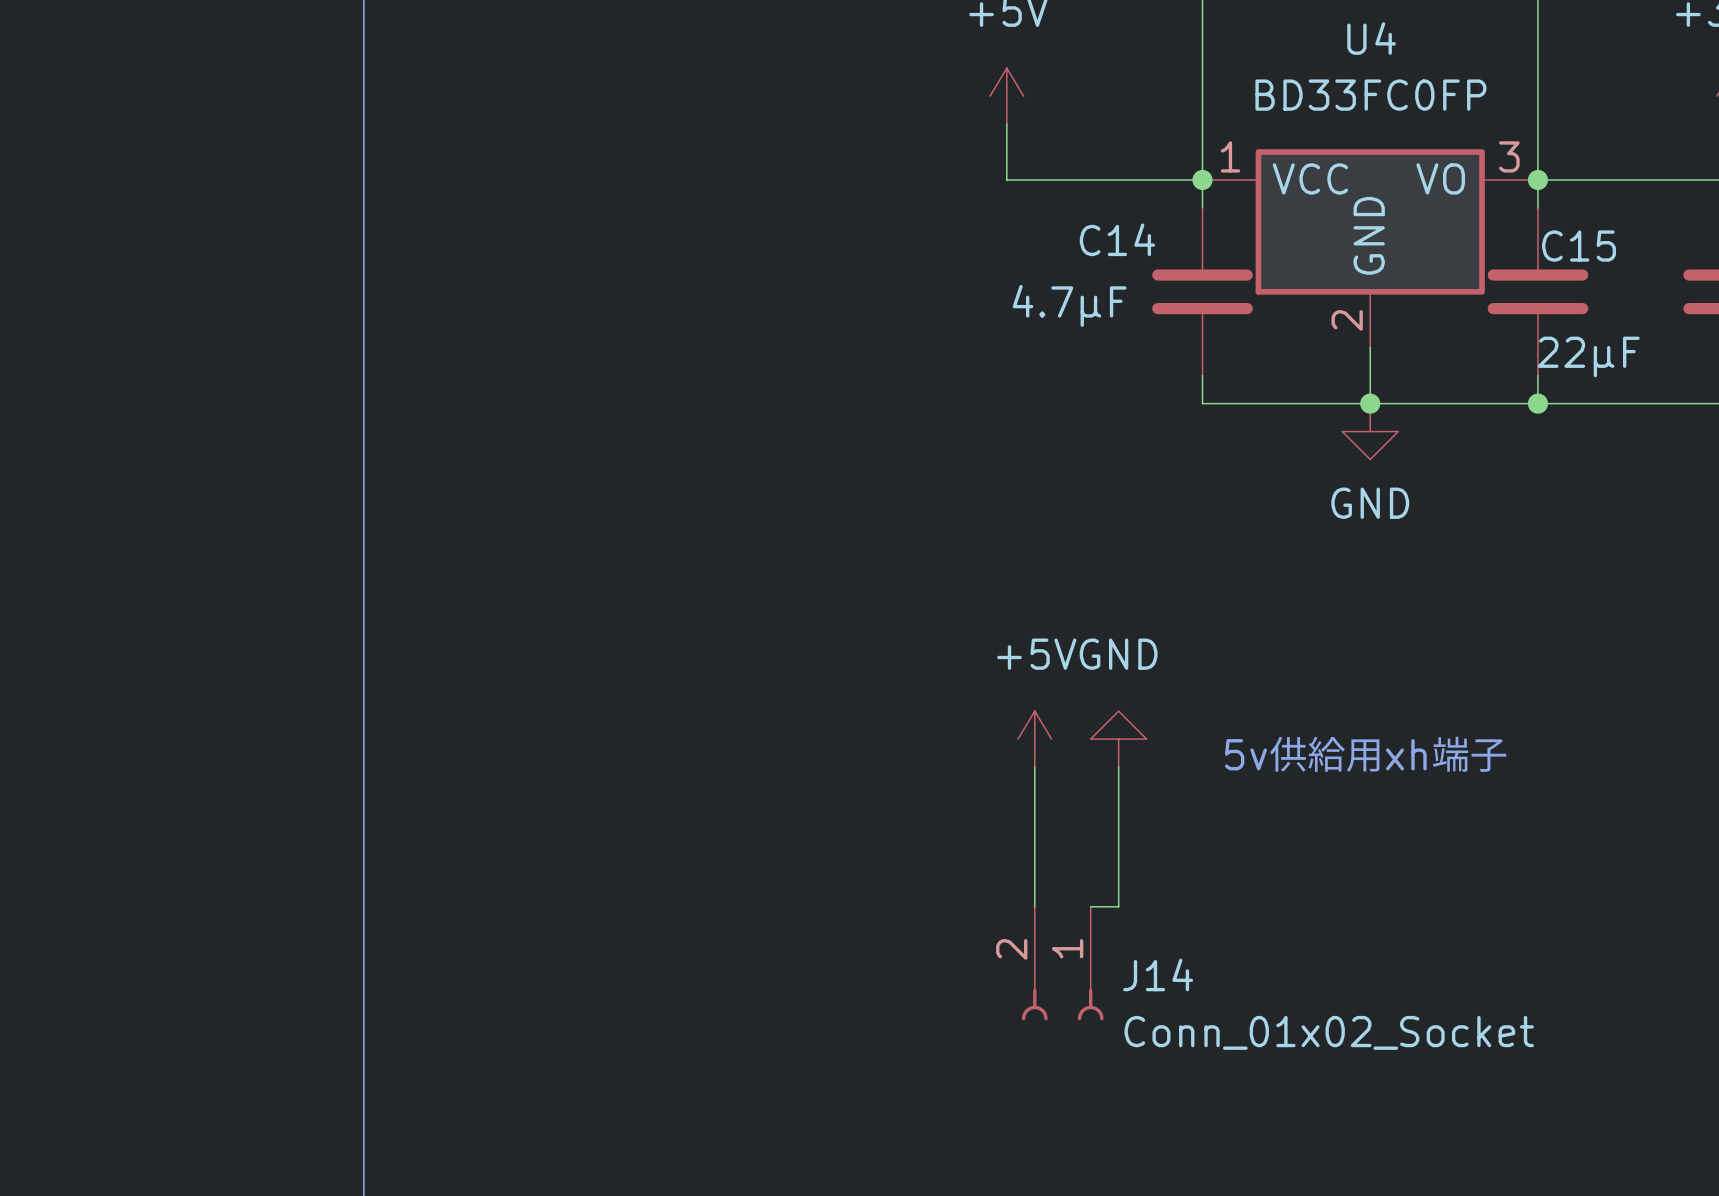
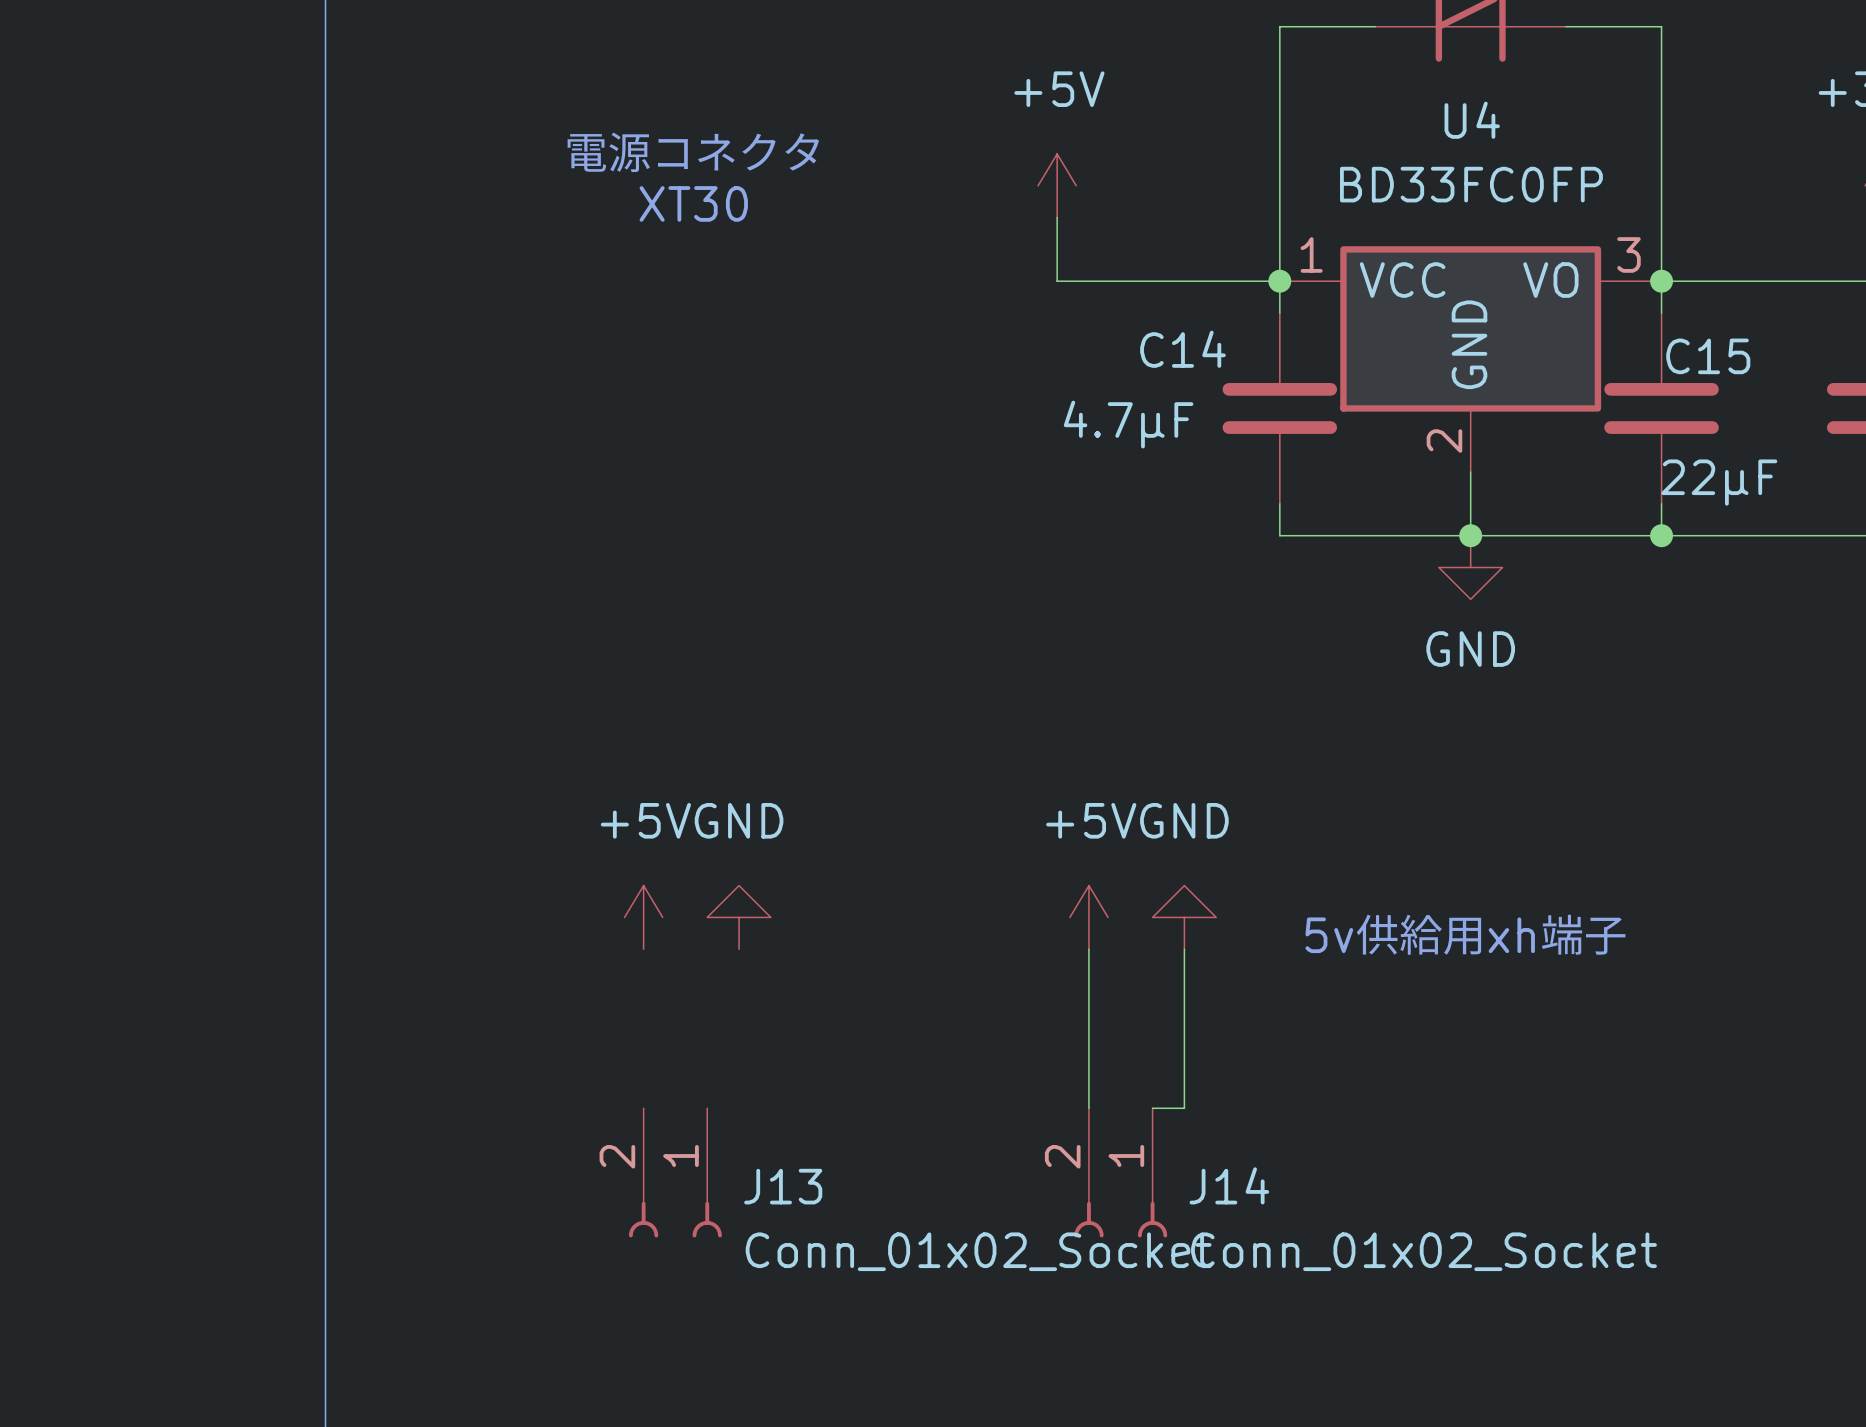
text: none -> 電源コネクタ (693, 152)
text: none -> XT30 (693, 203)
power symbol: none -> +5V (643, 917)
power symbol: none -> GND (739, 917)
J13: none -> Conn_01x02_Socket (675, 1172)

